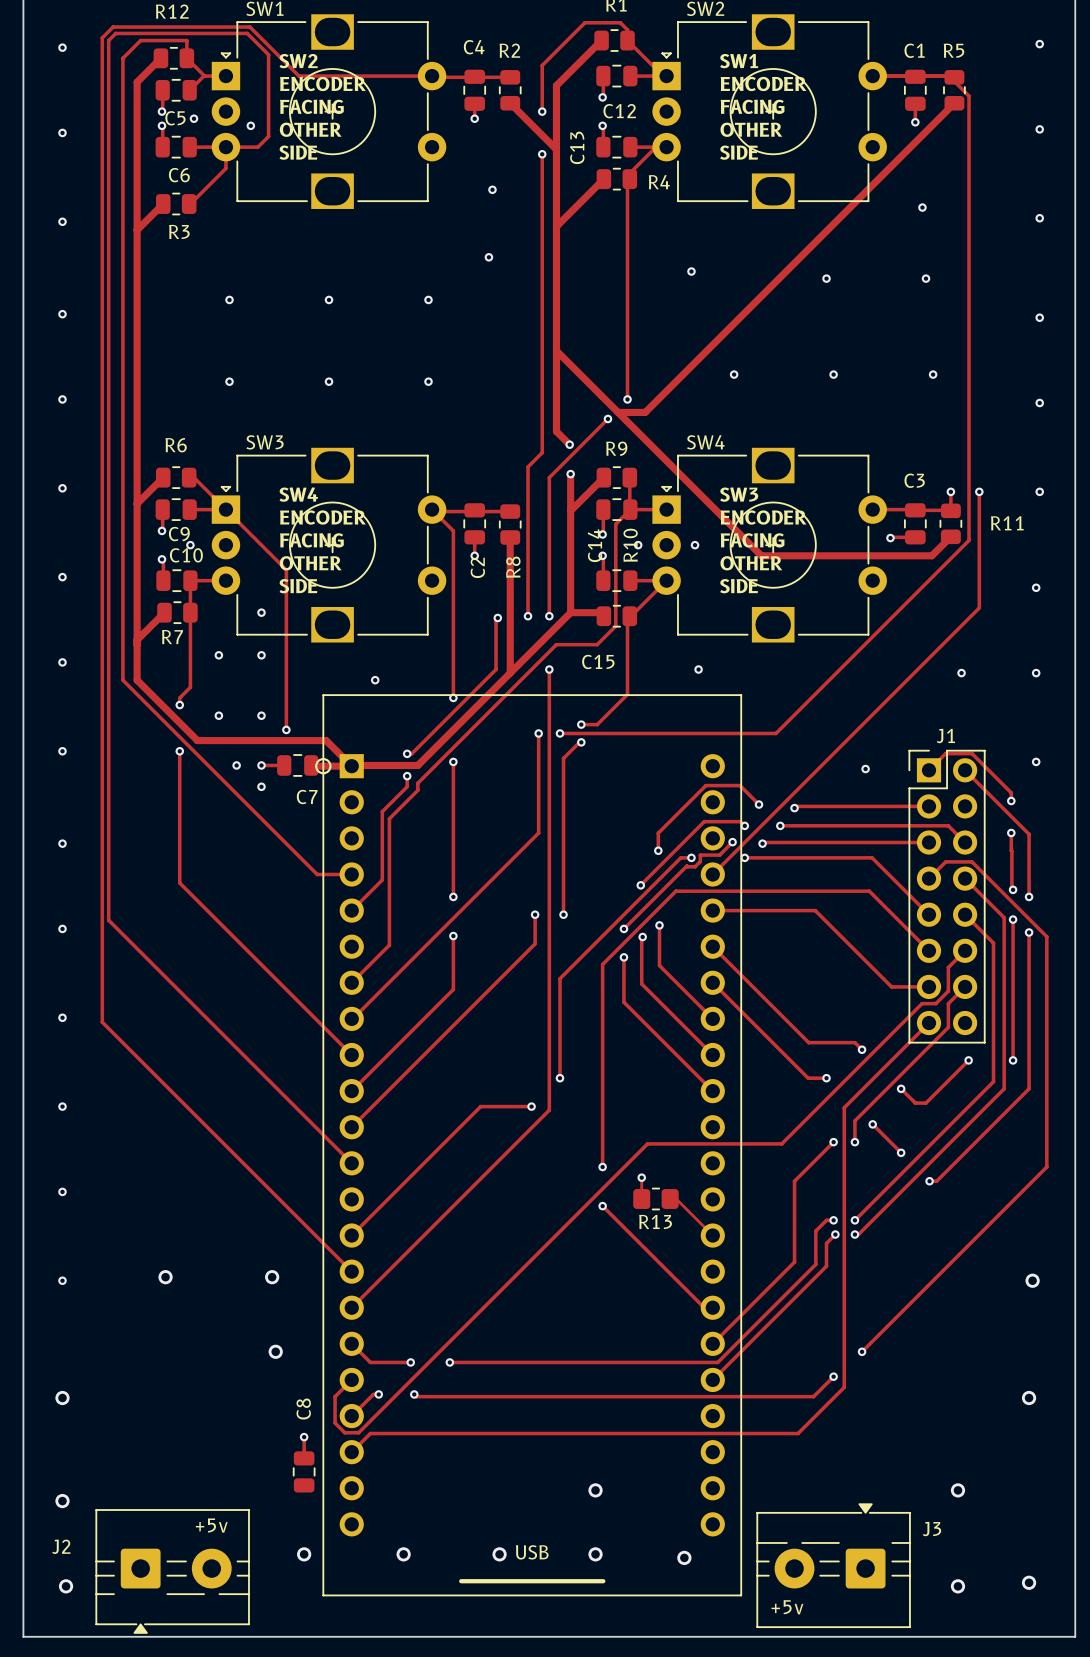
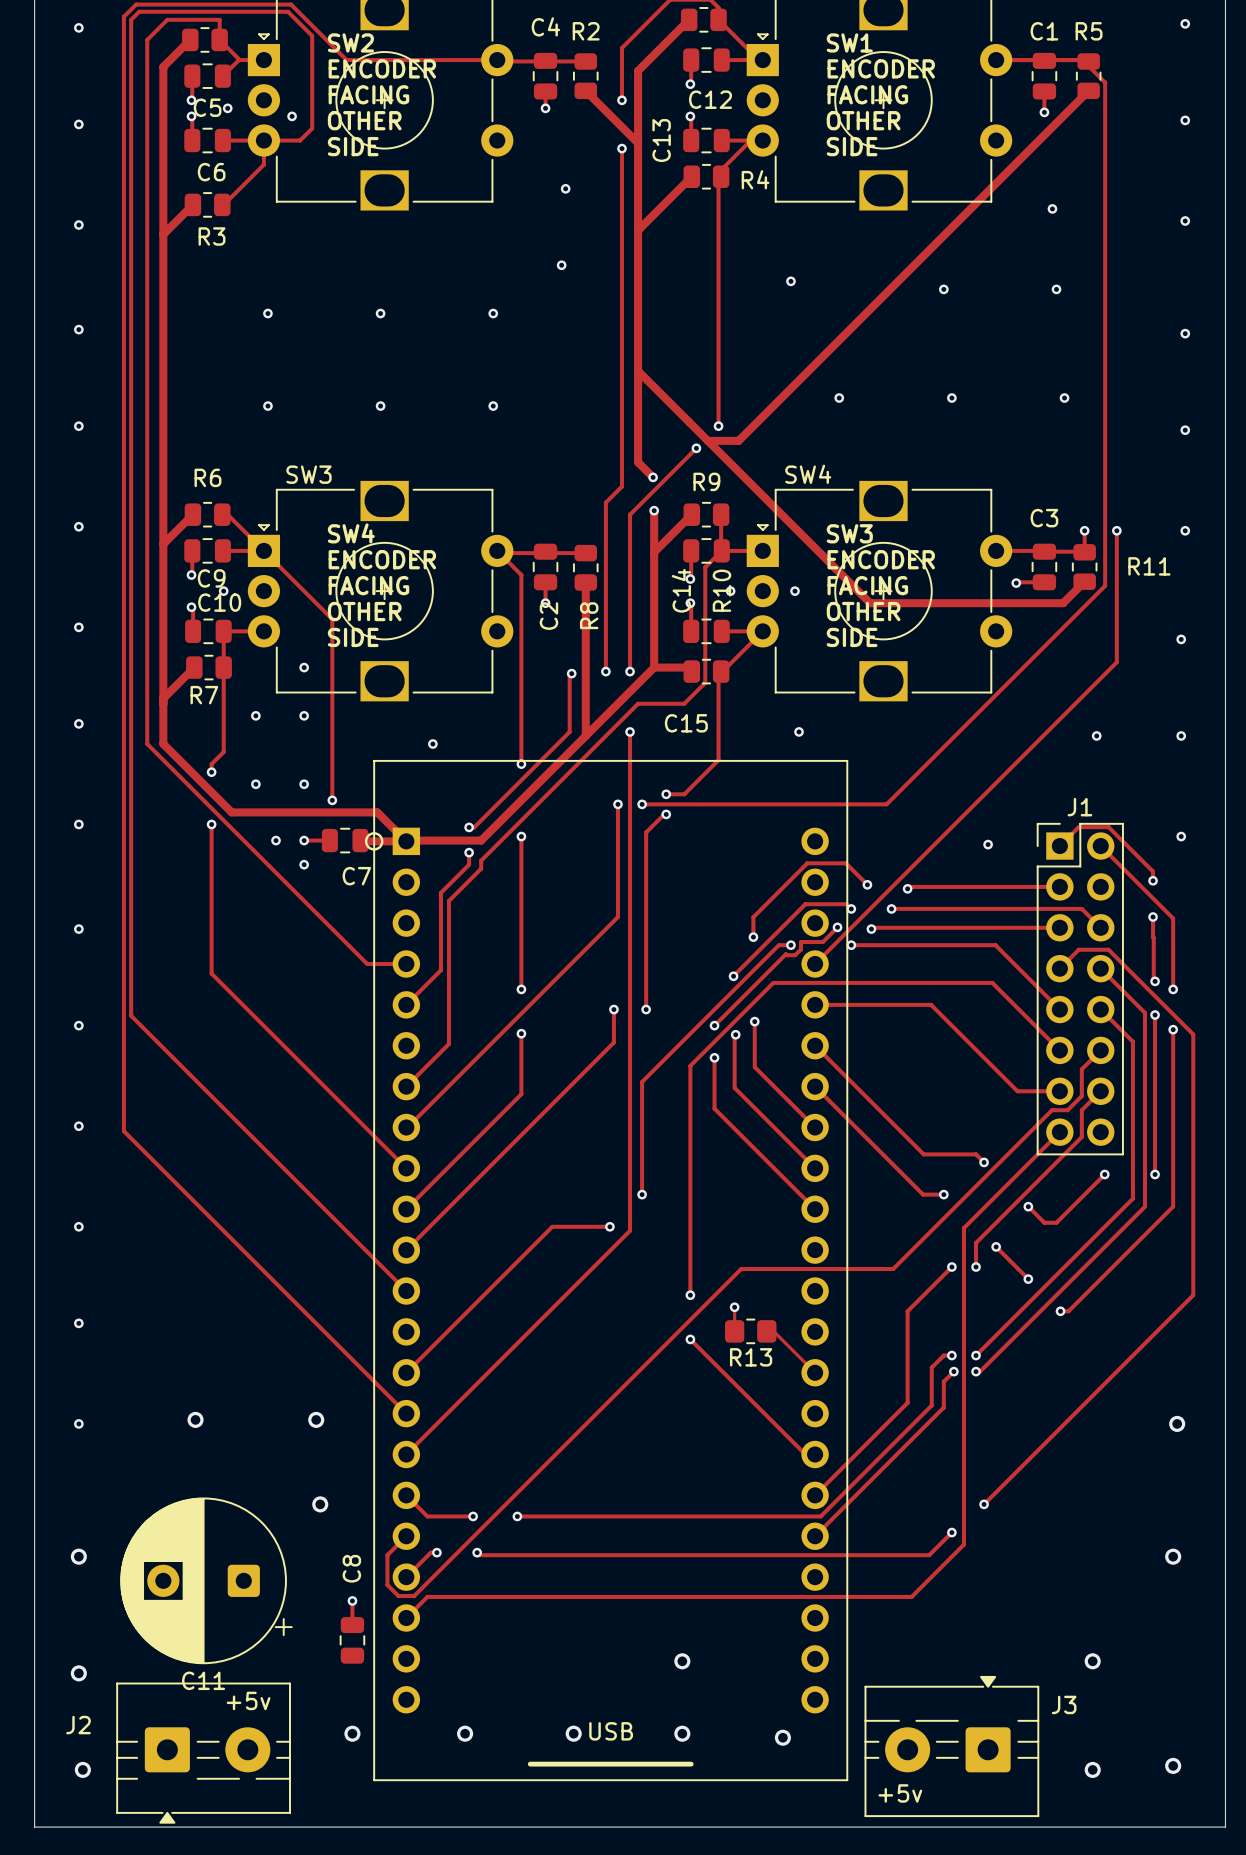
C11: none -> (206, 1580)

